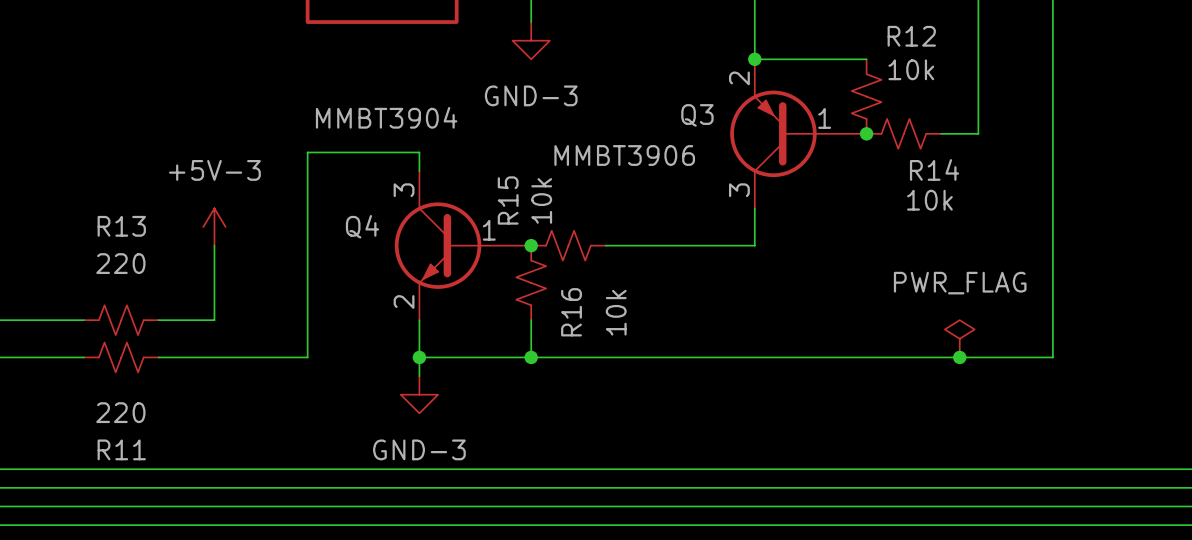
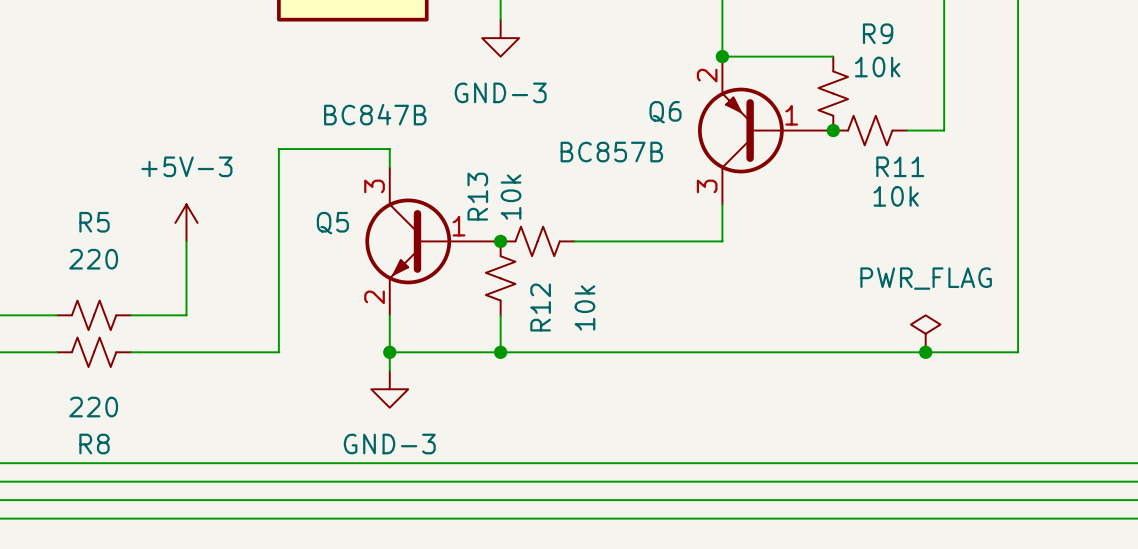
R12 name: R12 (911, 36) -> R9 (878, 33)
Q3 name: Q3 (697, 115) -> Q6 (665, 112)
Q4 value: MMBT3904 (386, 117) -> BC847B (375, 114)
Q3 value: MMBT3906 (624, 155) -> BC857B (611, 152)
R14 name: R14 (934, 169) -> R11 (900, 166)
R15 name: R15 (508, 200) -> R13 (477, 196)
R13 name: R13 (121, 226) -> R5 (94, 222)
Q4 name: Q4 (362, 226) -> Q5 (332, 223)
R16 name: R16 (571, 312) -> R12 (540, 307)
R11 name: R11 (121, 449) -> R8 (94, 444)

